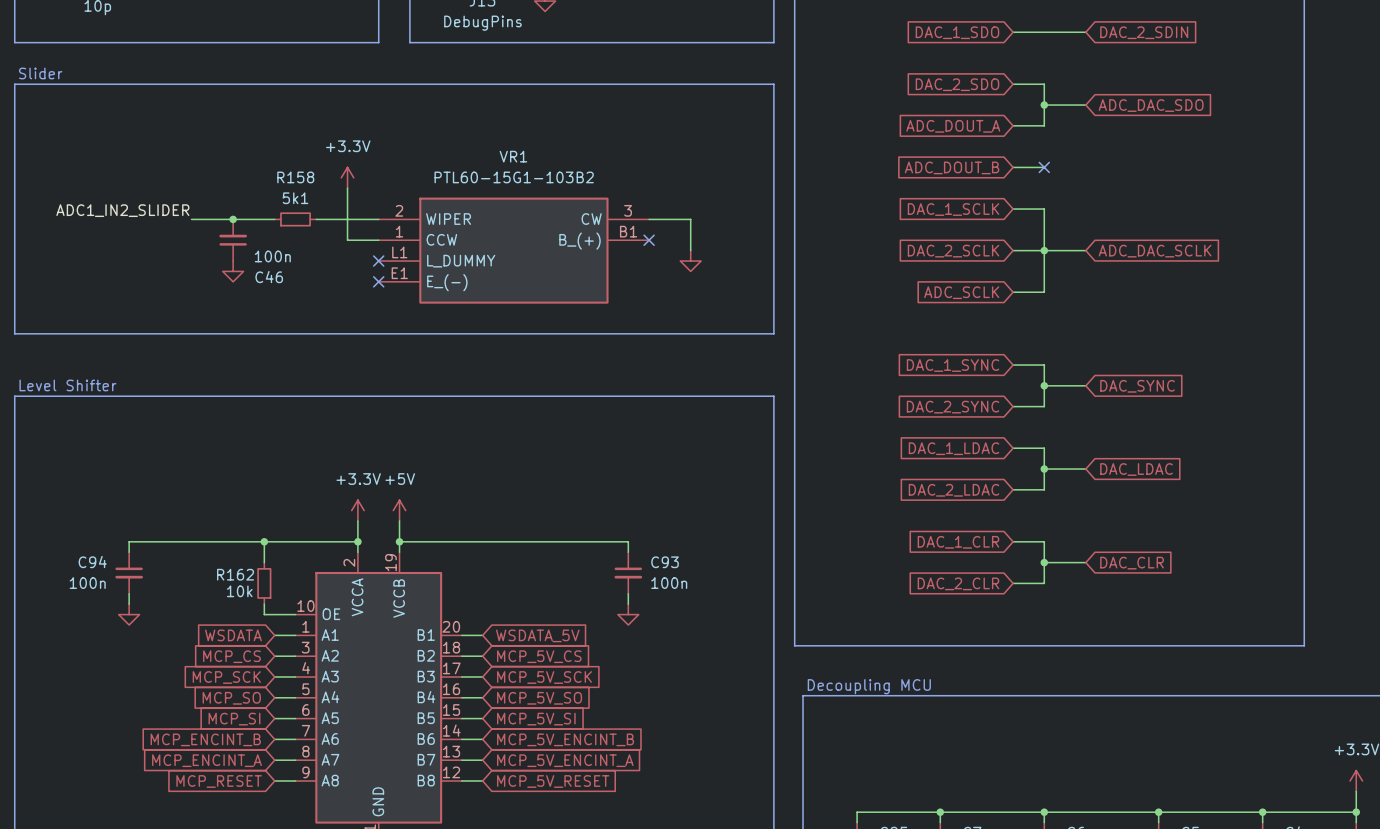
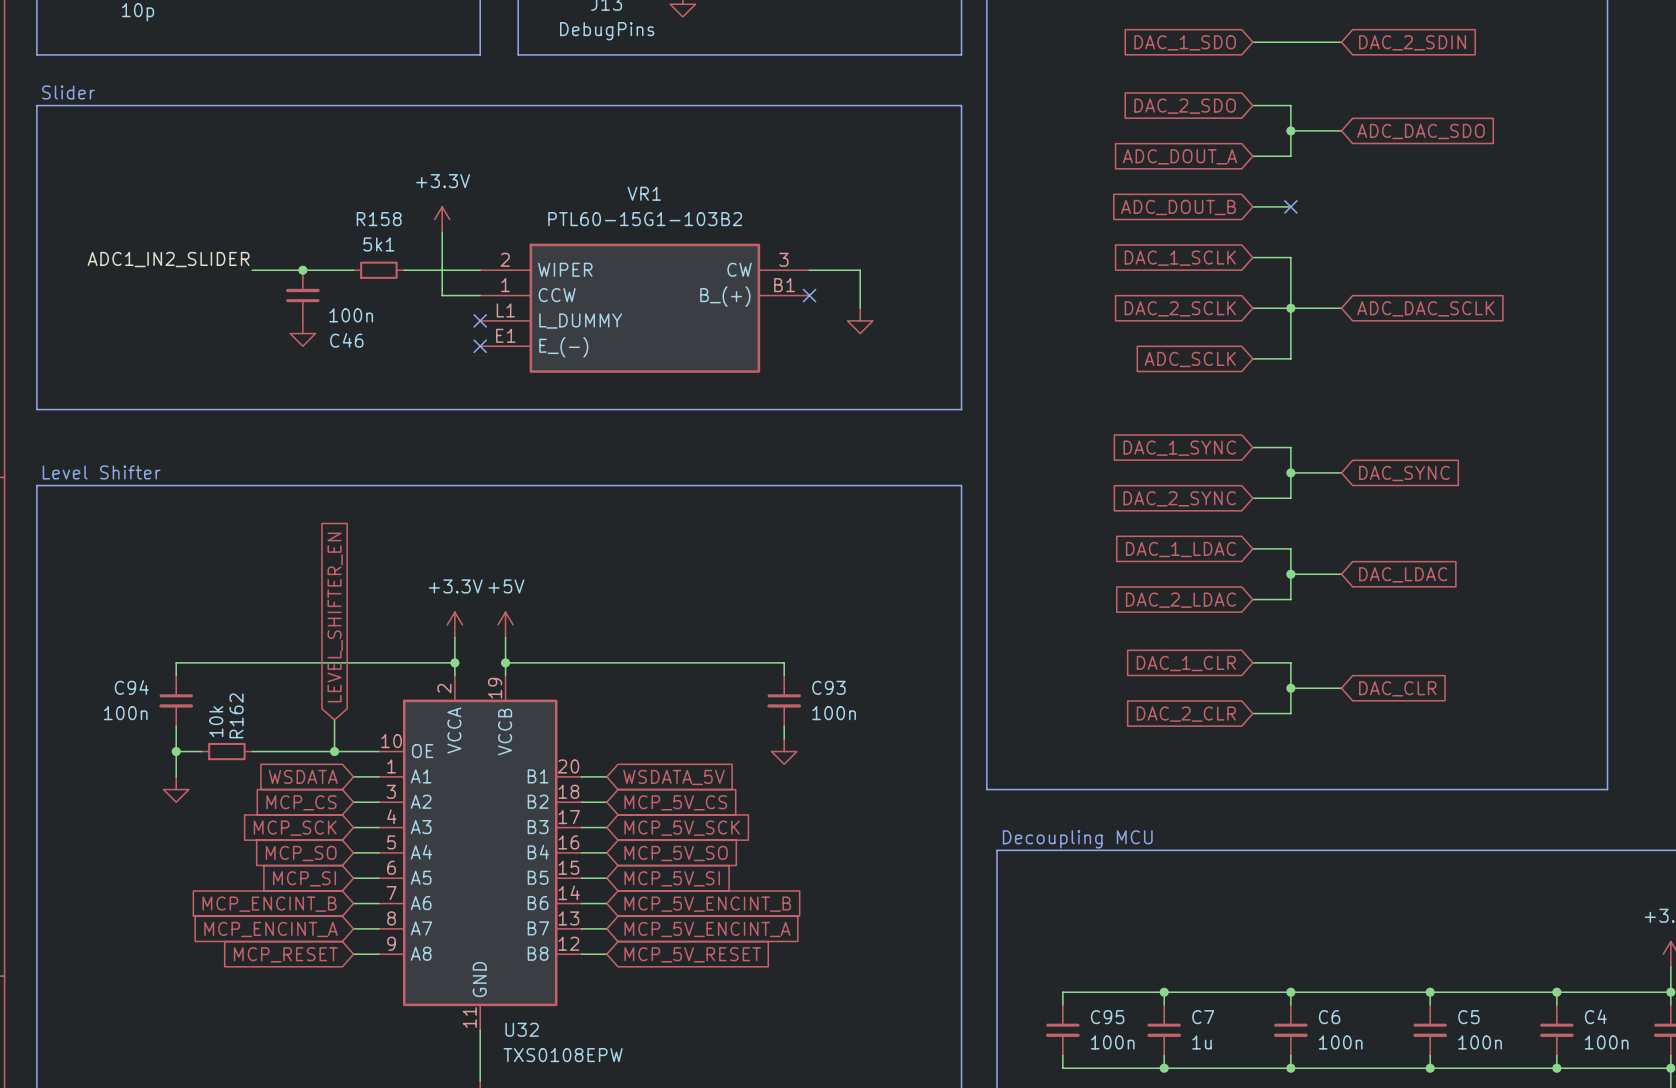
global label: none -> LEVEL_SHIFTER_EN (335, 617)
wire: (264, 541) (264, 562) -> none
junction: (264, 541) -> none
R162 rotation: 0° (264, 583) -> 90° clockwise (226, 751)
R162 position: (264, 583) -> (226, 751)
wire: none -> (334, 719) (334, 751)
wire: none -> (176, 738) (176, 776)
wire: (264, 604) (264, 614) -> (252, 751) (340, 751)
wire: none -> (176, 751) (201, 751)
junction: none -> (176, 751)
power symbol position: (129, 614) -> (176, 789)
junction: none -> (334, 751)

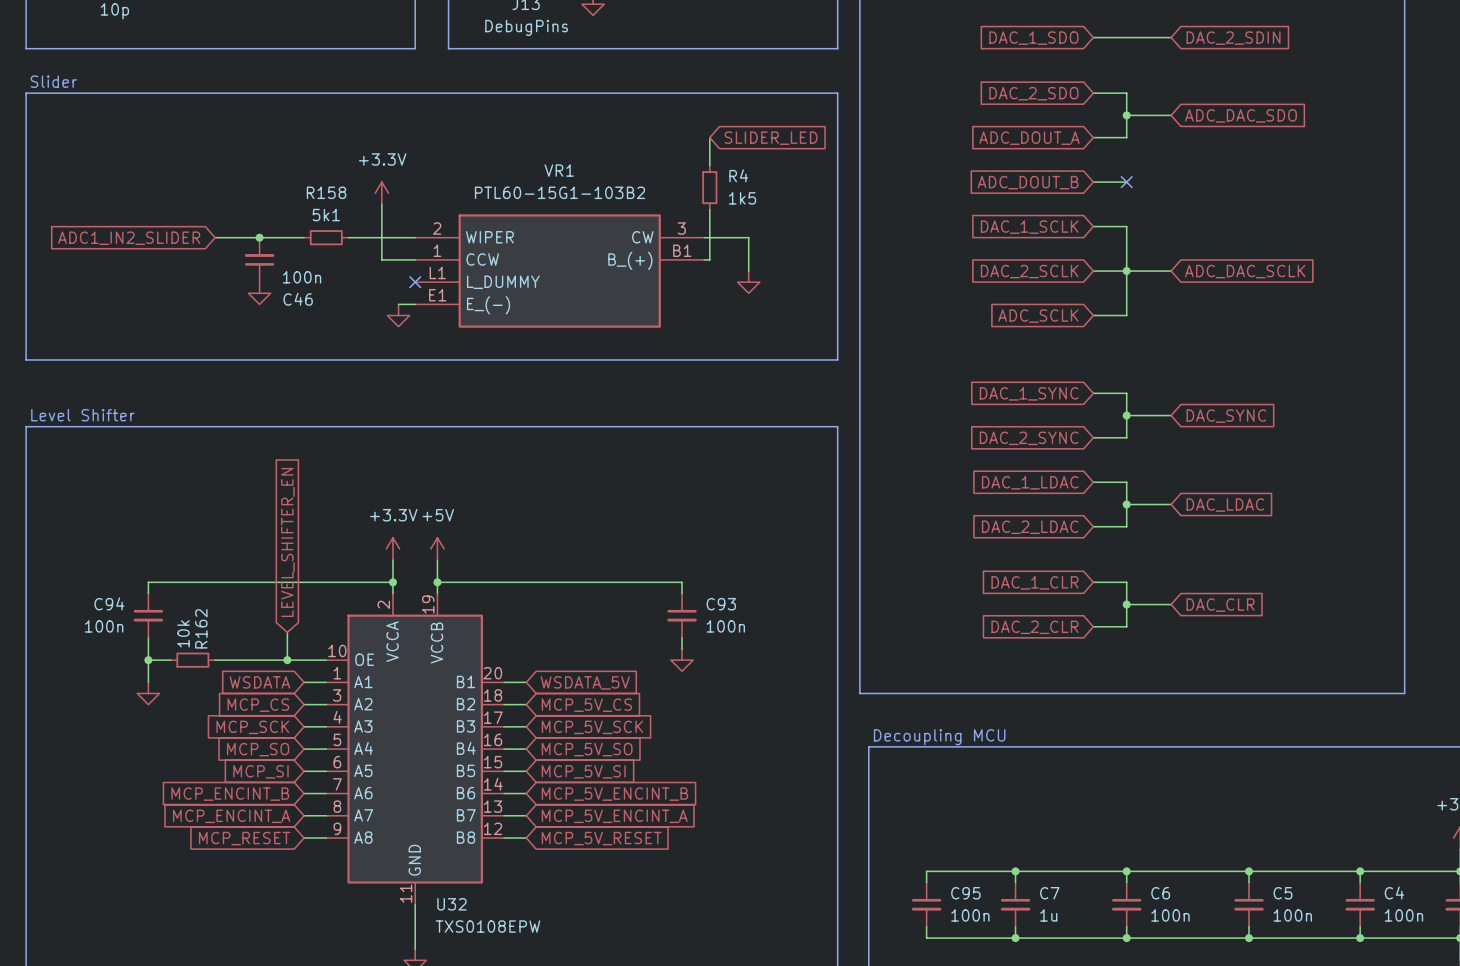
wire: none -> (709, 137) (709, 165)
global label: none -> SLIDER_LED (771, 138)
R4: none -> 1k5 (709, 187)
wire: none -> (709, 209) (709, 259) (704, 259)
label: ADC1_IN2_SLIDER (168, 259) -> none
global label: none -> ADC1_IN2_SLIDER (129, 238)
no-connect mark: (809, 295) -> none
wire: none -> (398, 304) (415, 304)
no-connect mark: (480, 346) -> none
power symbol: none -> (398, 315)

